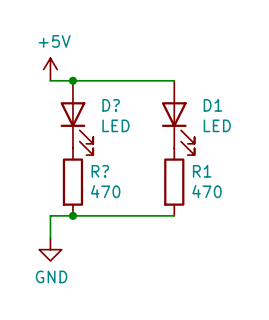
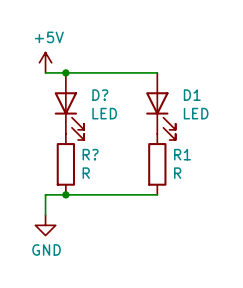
R? value: 470 (105, 191) -> R (86, 173)
R1 value: 470 (207, 191) -> R (177, 173)

